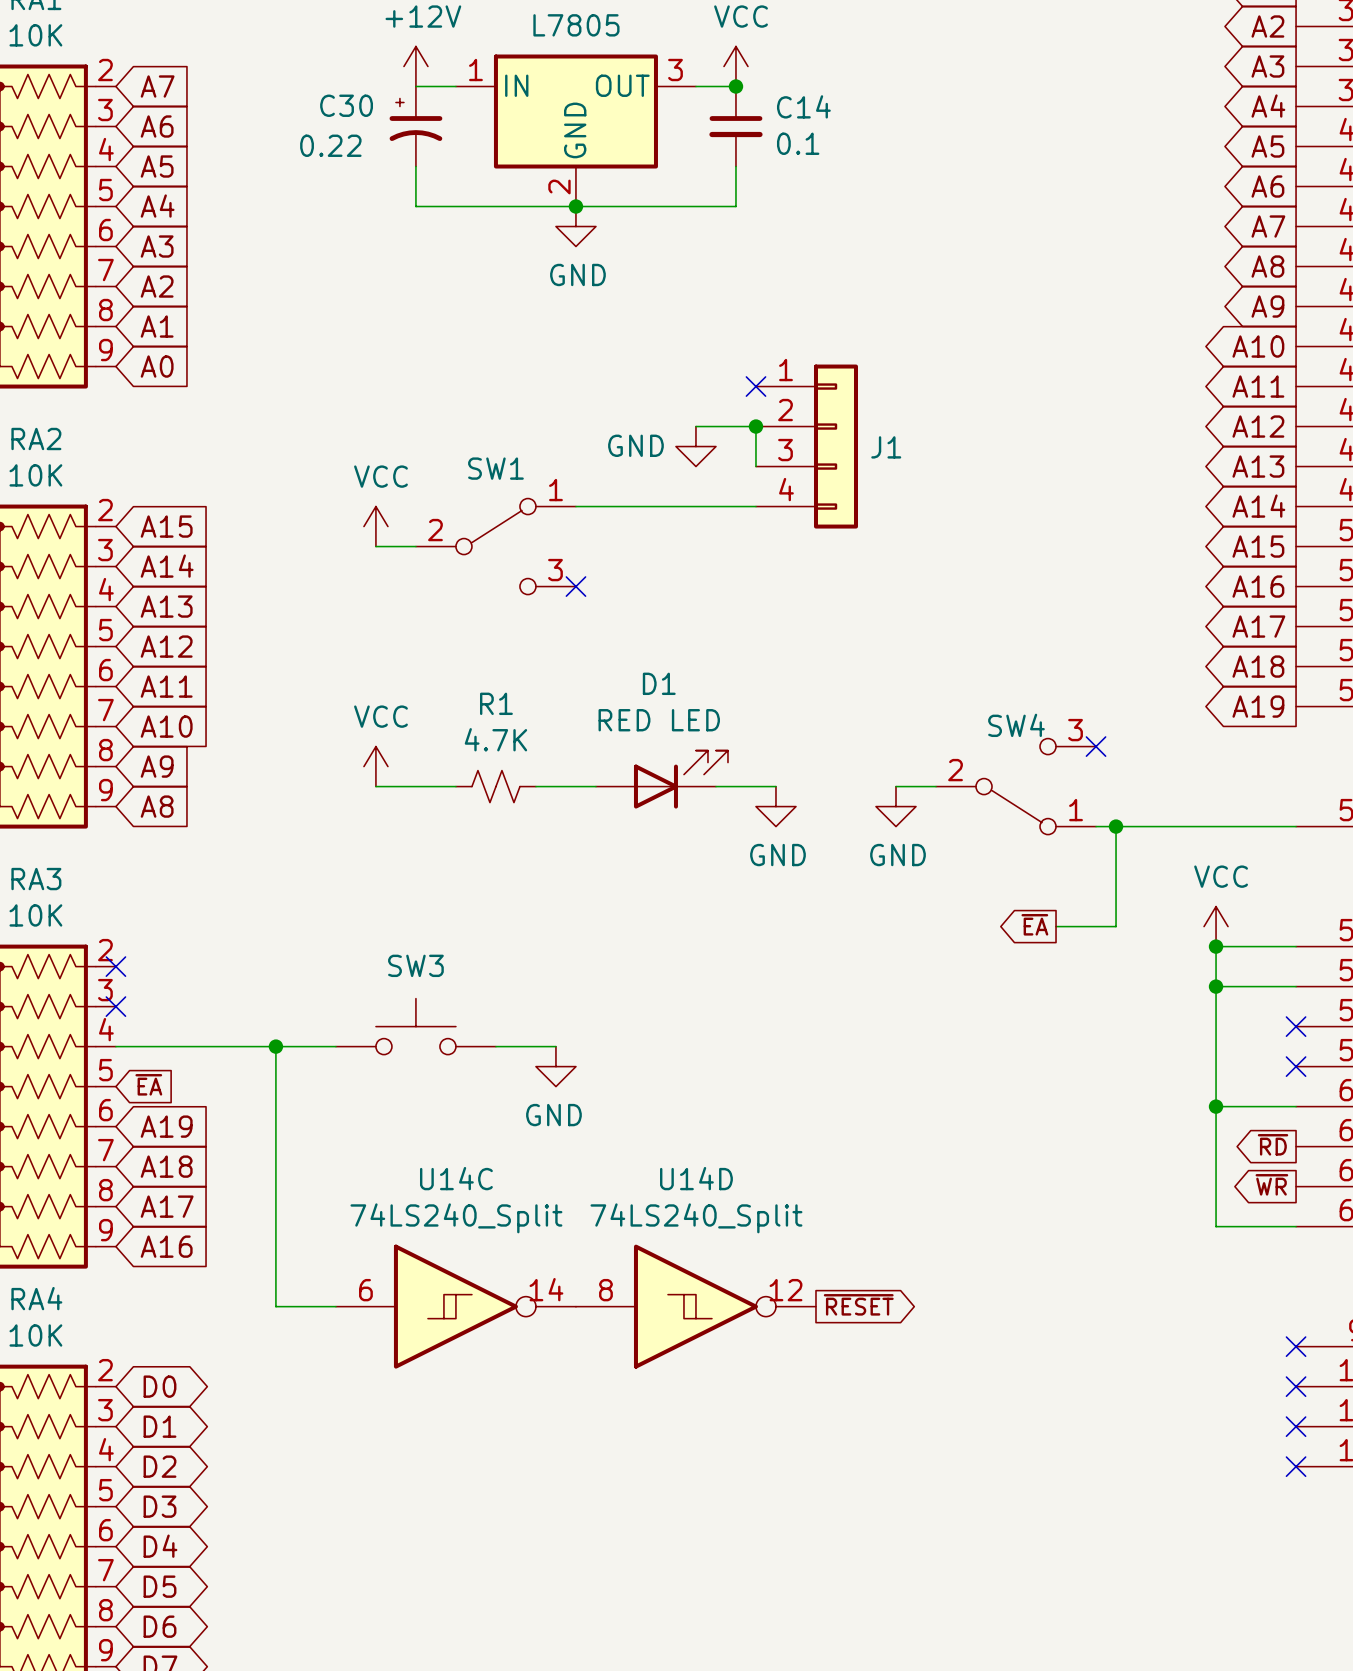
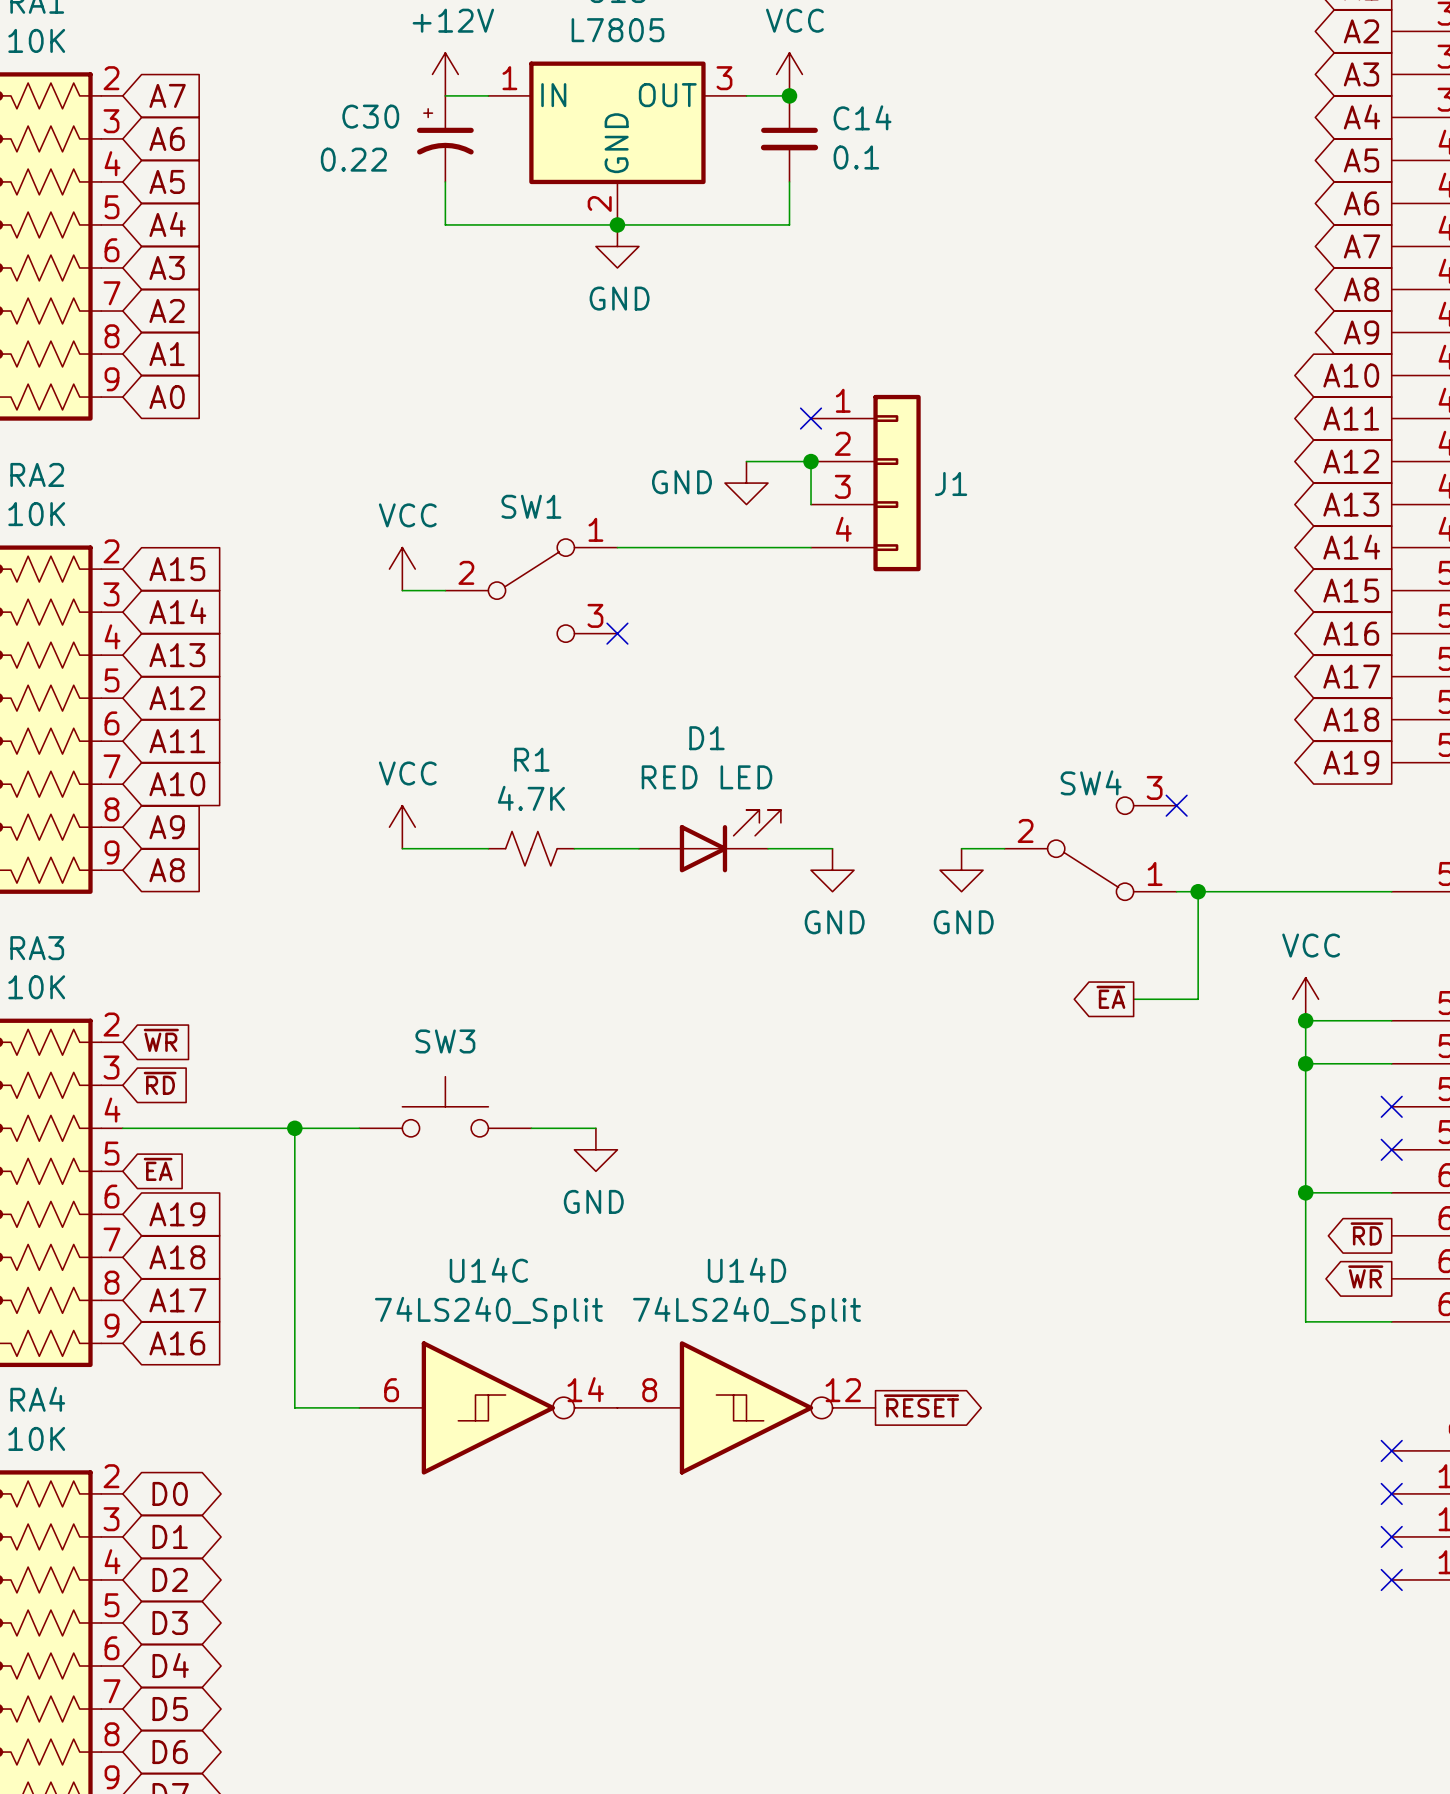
global label: none -> ~{WR} (161, 1040)
no-connect mark: (115, 966) -> none
global label: none -> ~{RD} (160, 1083)
no-connect mark: (115, 1006) -> none

